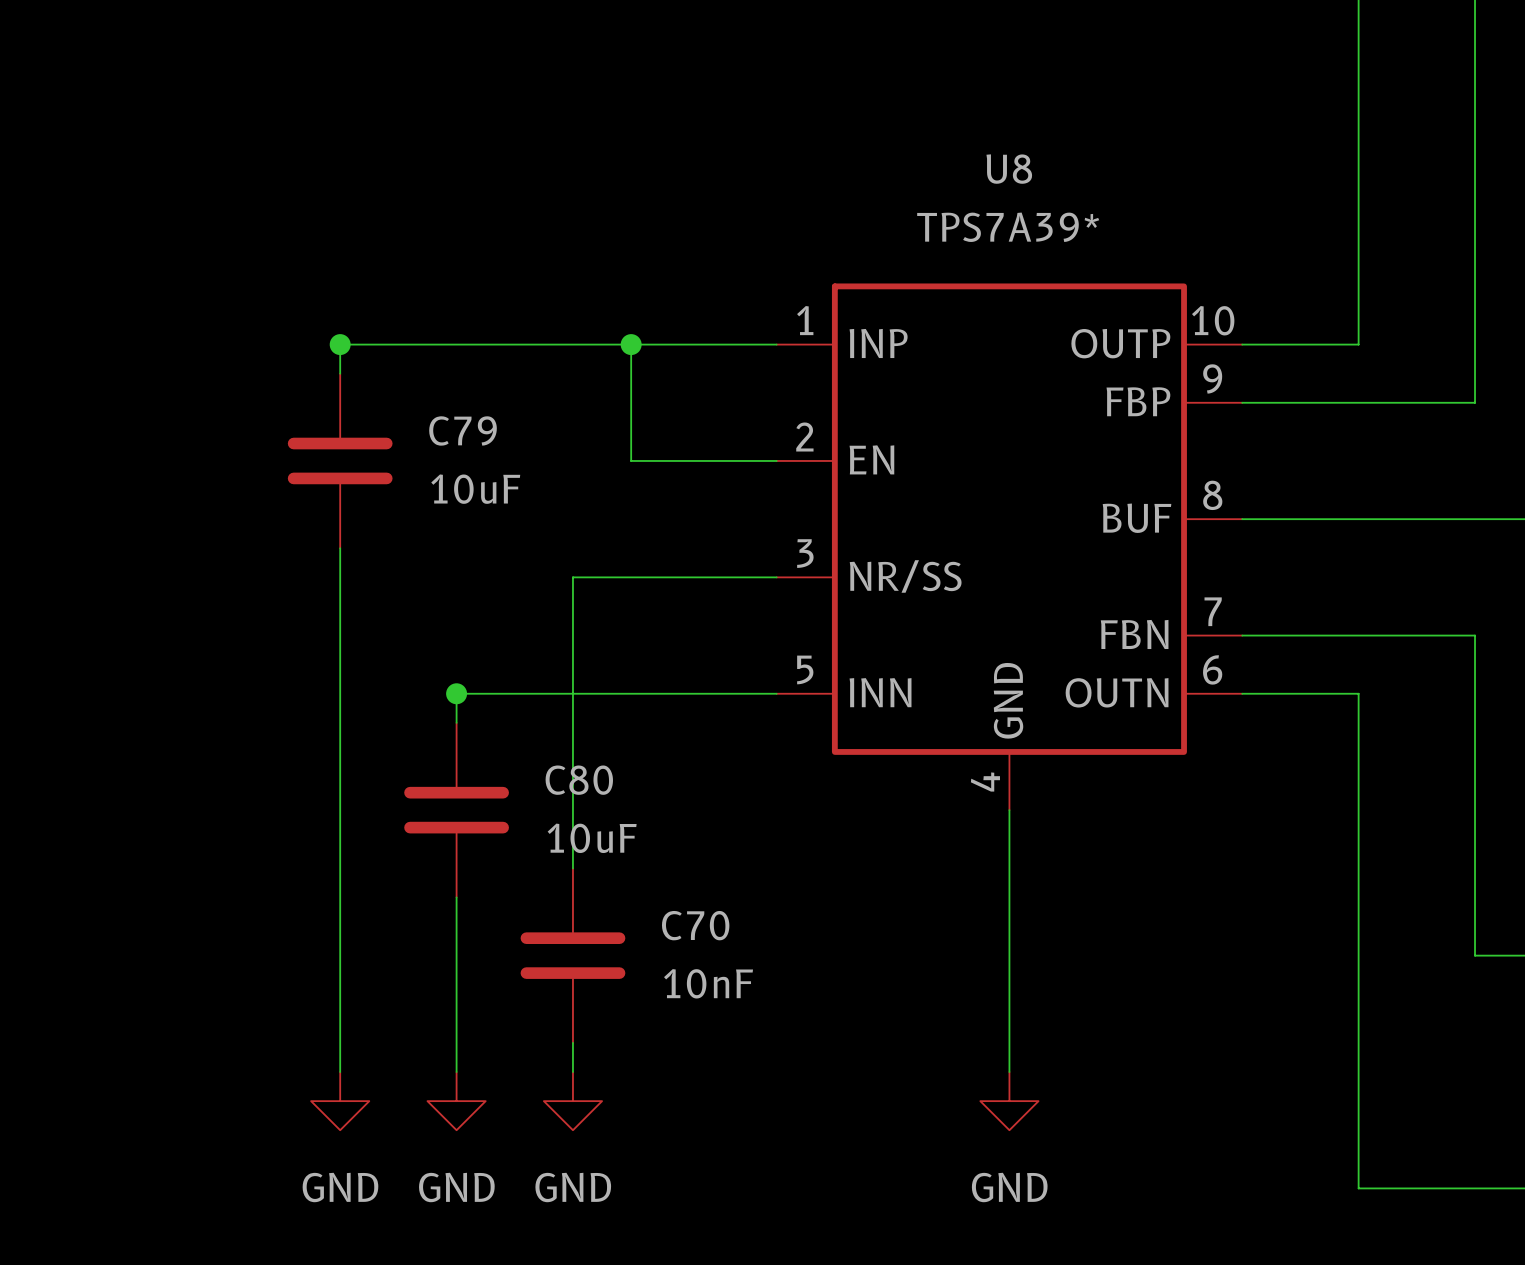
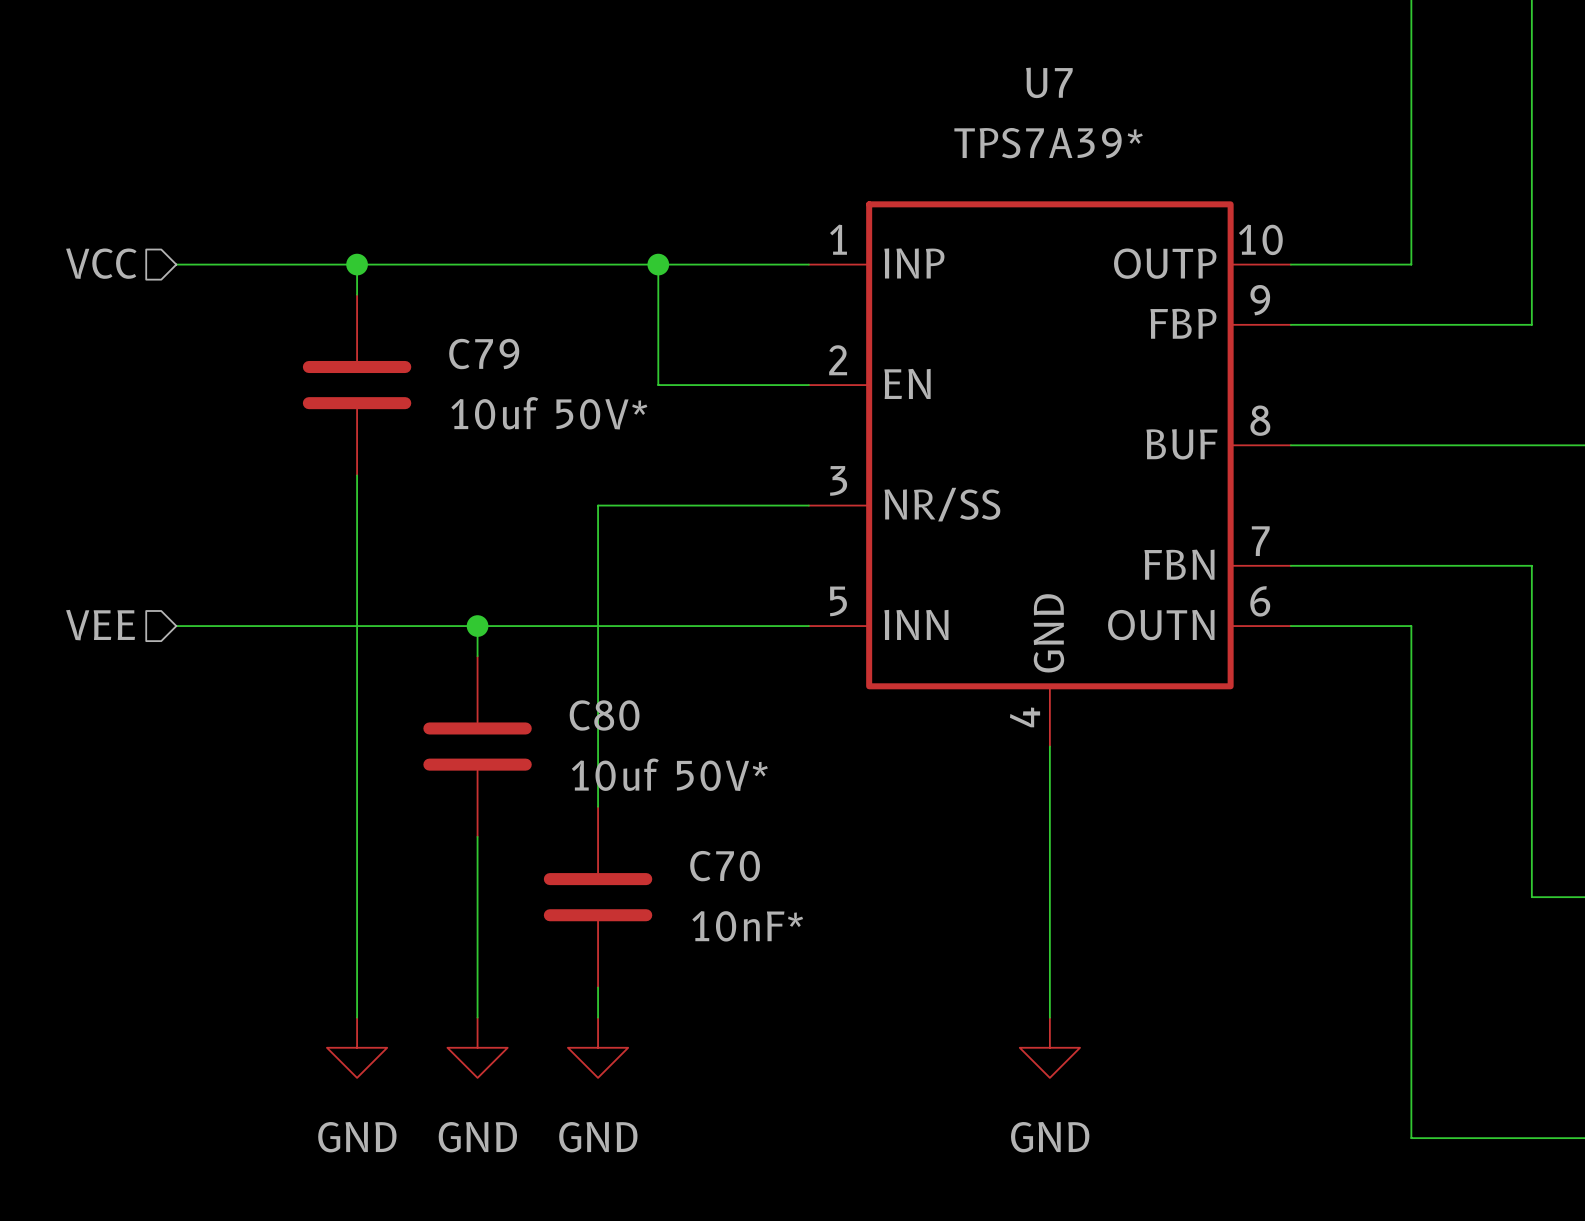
U8 name: U8 (1009, 169) -> U7 (1049, 82)
hierarchical label: none -> VCC (101, 263)
wire: none -> (176, 264) (357, 264)
C79 value: 10uF (475, 489) -> 10uf 50V* (549, 413)
hierarchical label: none -> VEE (100, 625)
wire: none -> (176, 626) (477, 626)
C80 value: 10uF (592, 838) -> 10uf 50V* (669, 774)
C70 value: 10nF (708, 983) -> 10nF* (747, 926)

